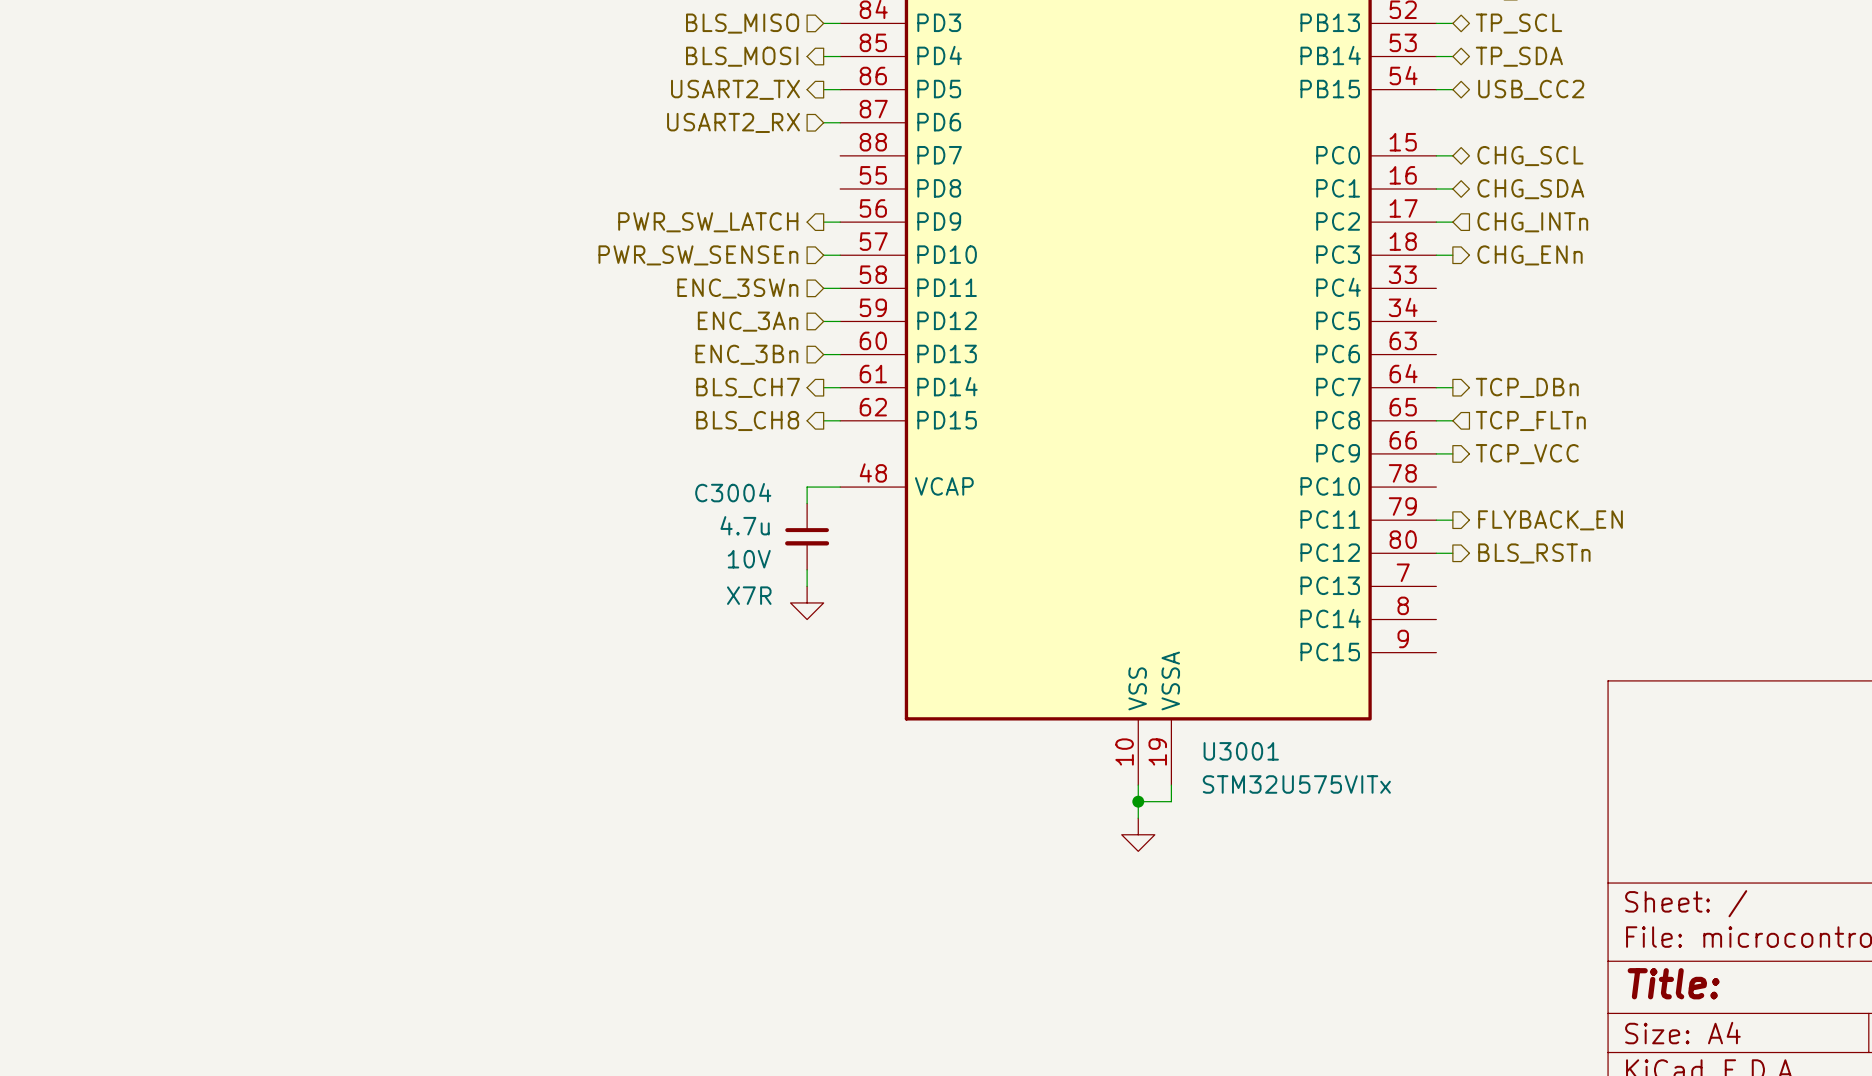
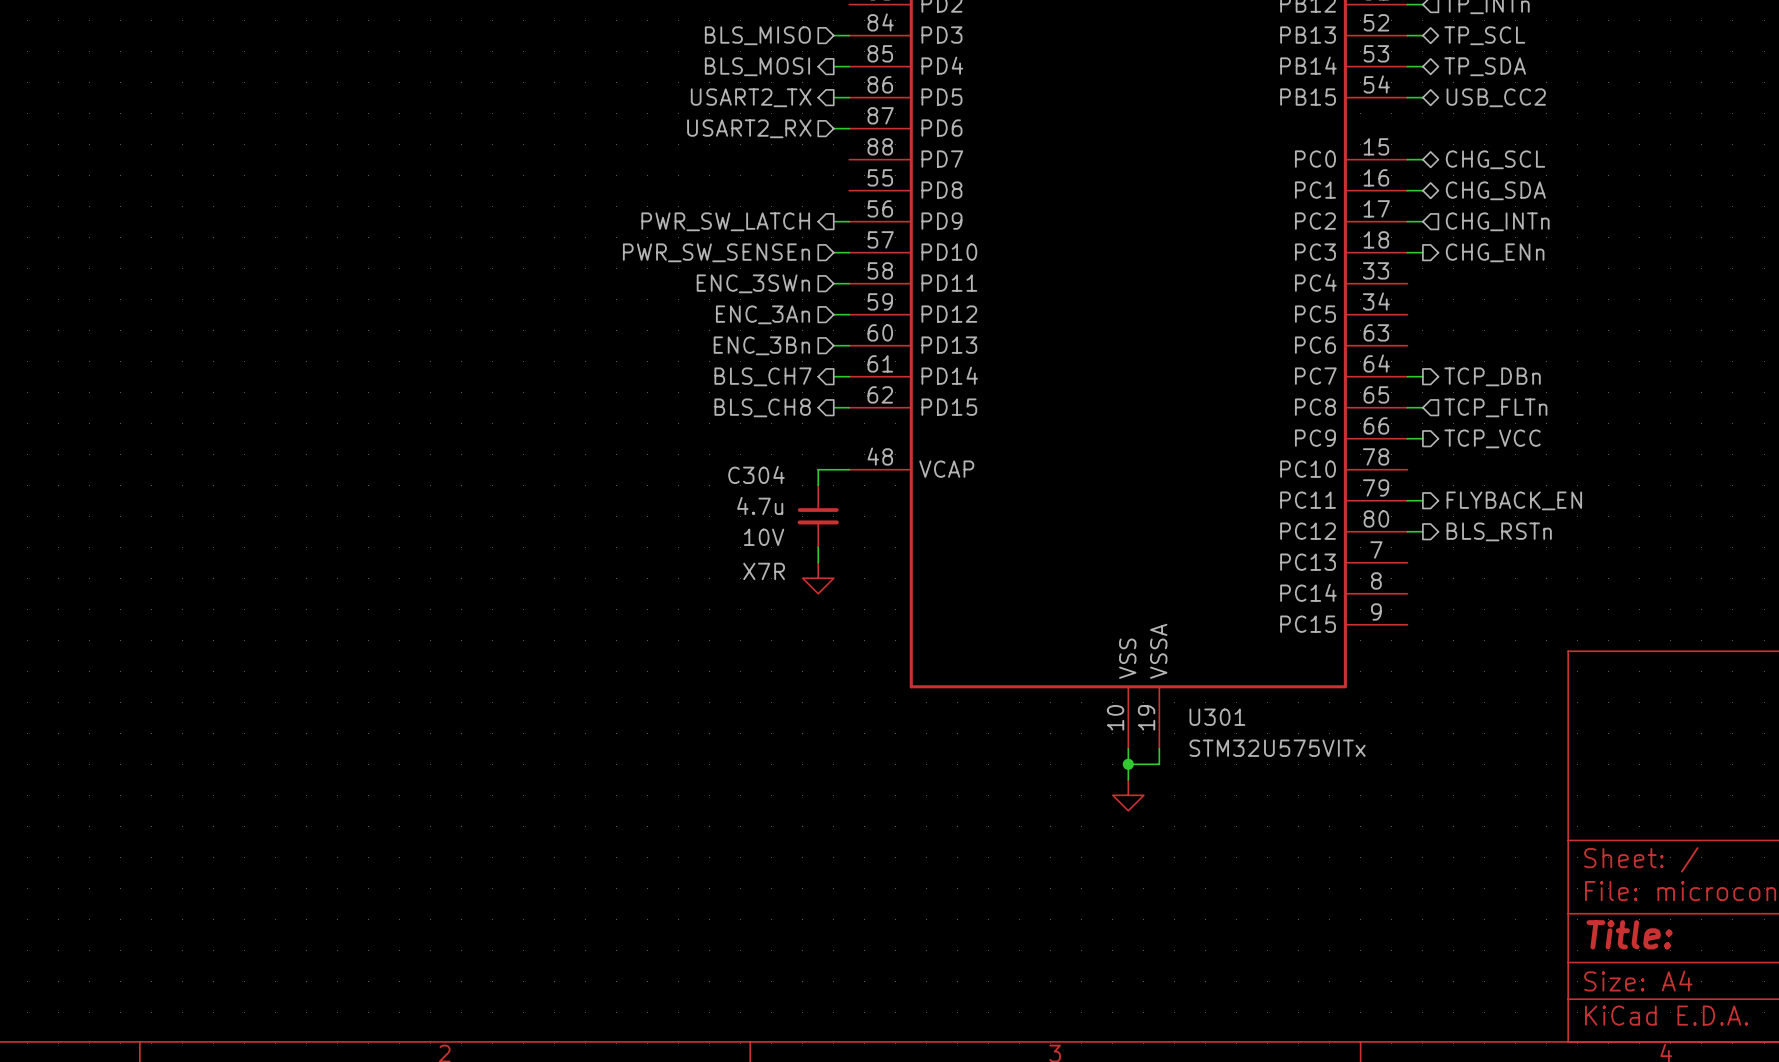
C3004 name: C3004 (733, 492) -> C304 (756, 474)
U3001 name: U3001 (1241, 751) -> U301 (1217, 717)
U3001 value: STM32U575VITx (1296, 784) -> none
U3001 text: none -> STM32U575VITx (1277, 748)

